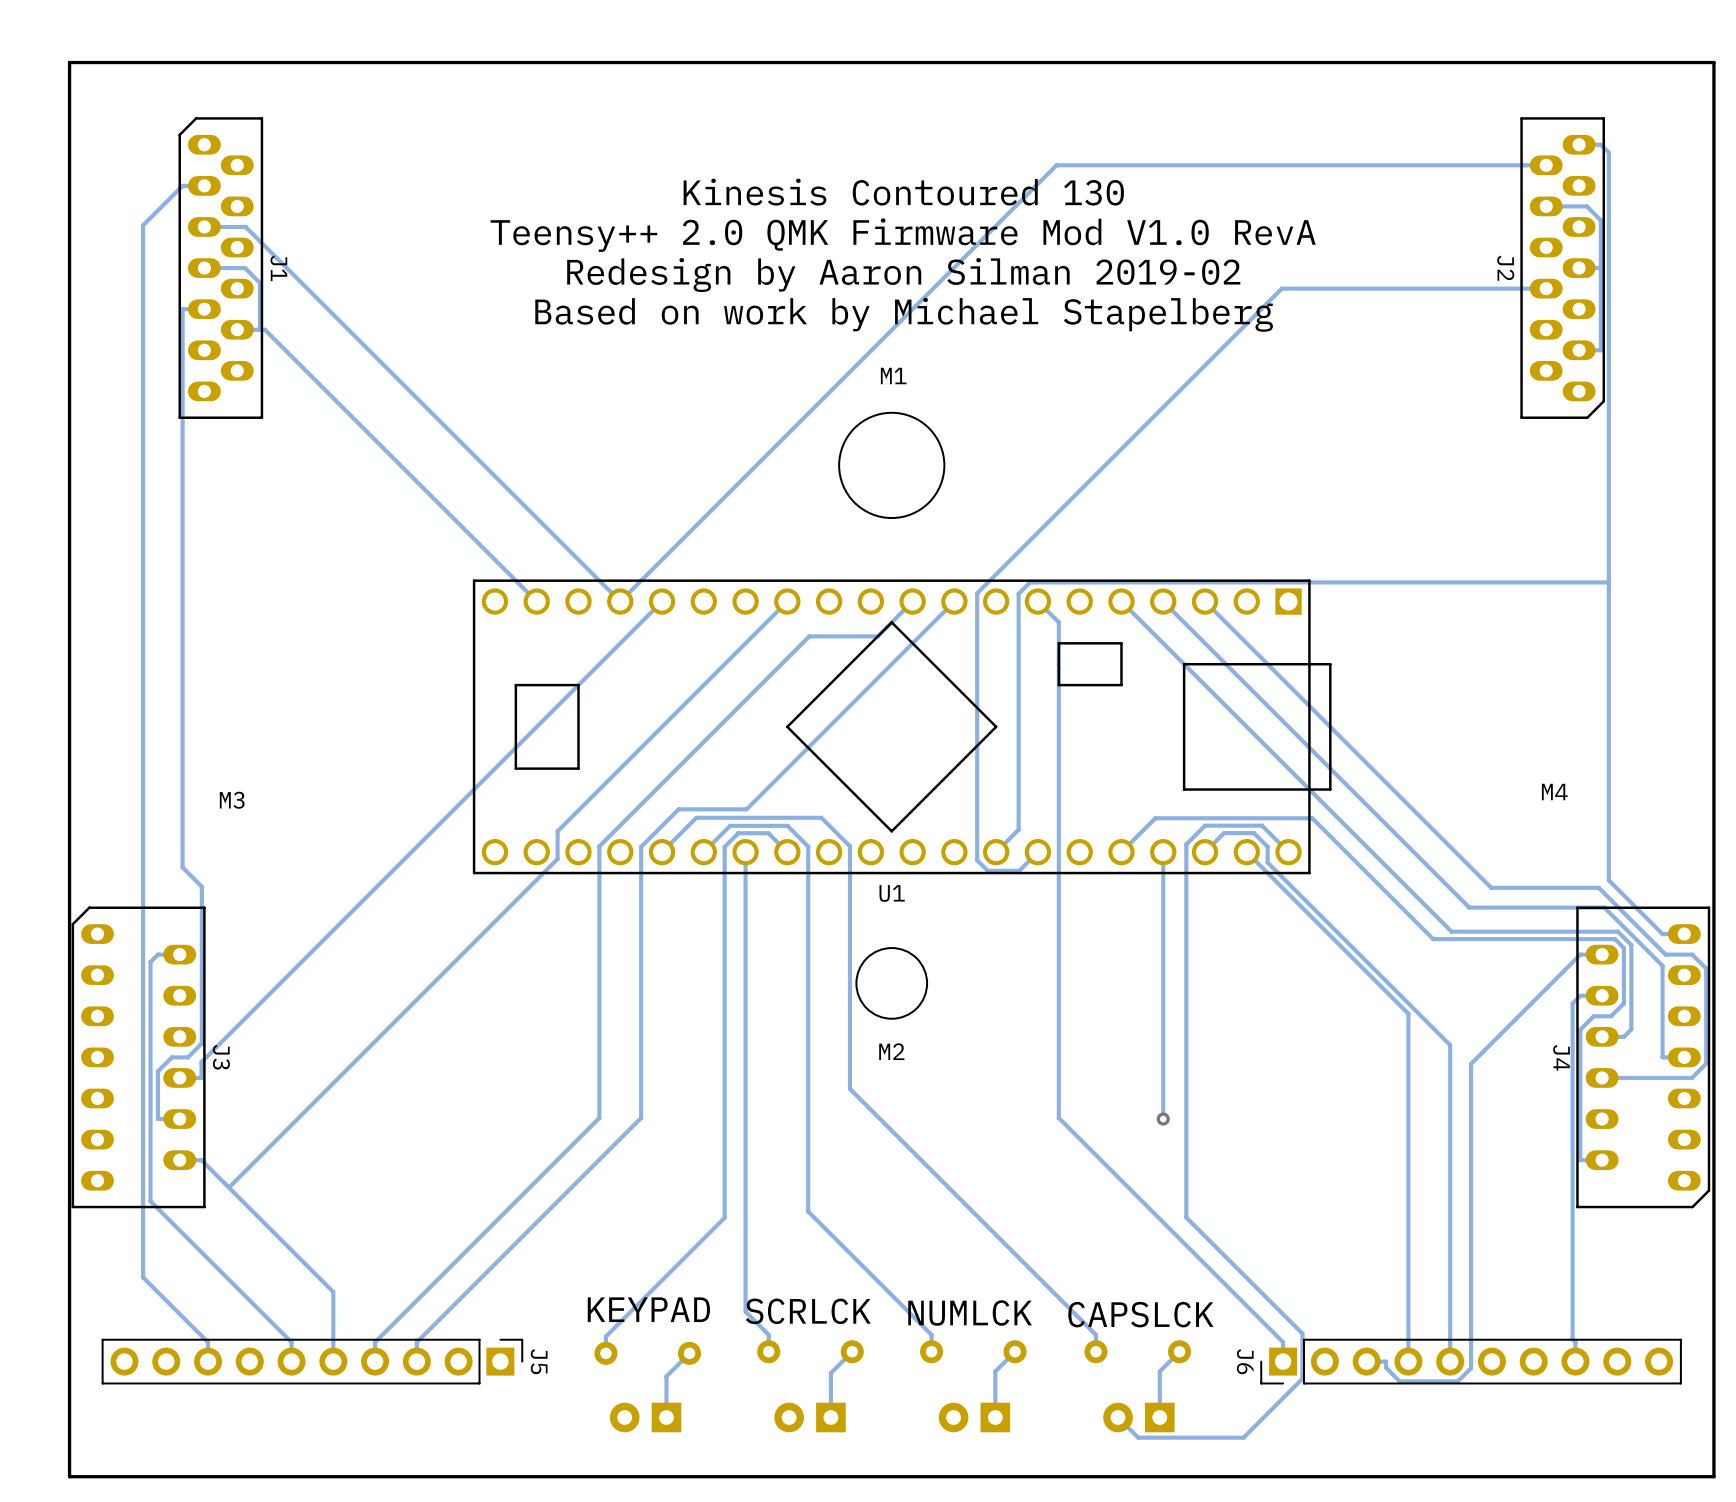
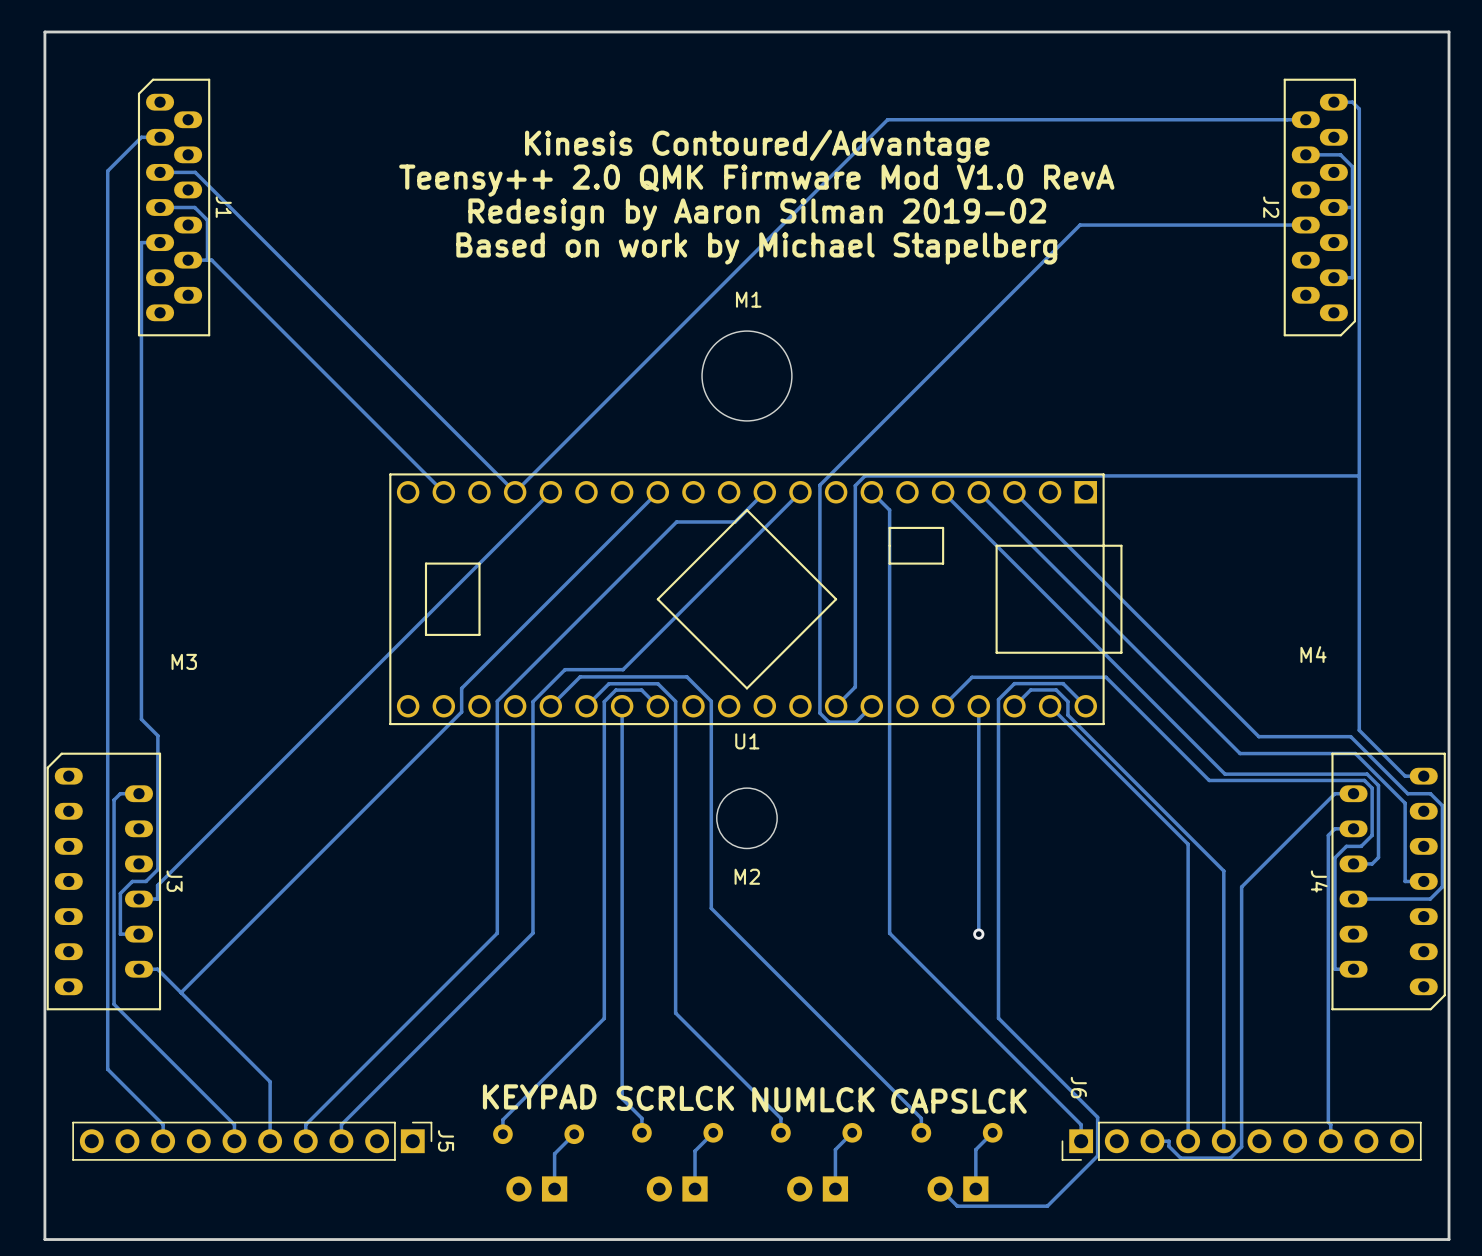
text: Kinesis Contoured 130 (903, 192) -> Kinesis Contoured/Advantage (757, 146)
J6 name position: J6 (1245, 1361) -> J6 (1078, 1087)

